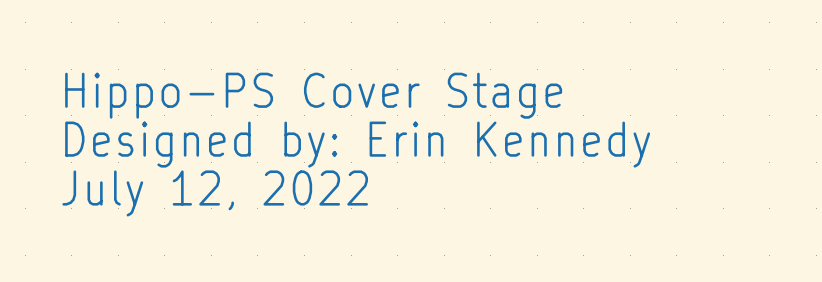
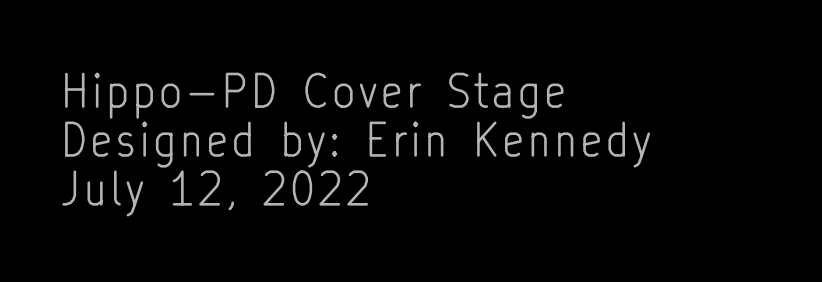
text: Hippo-PS Cover Stage (313, 95) -> Hippo-PD Cover Stage (314, 95)

